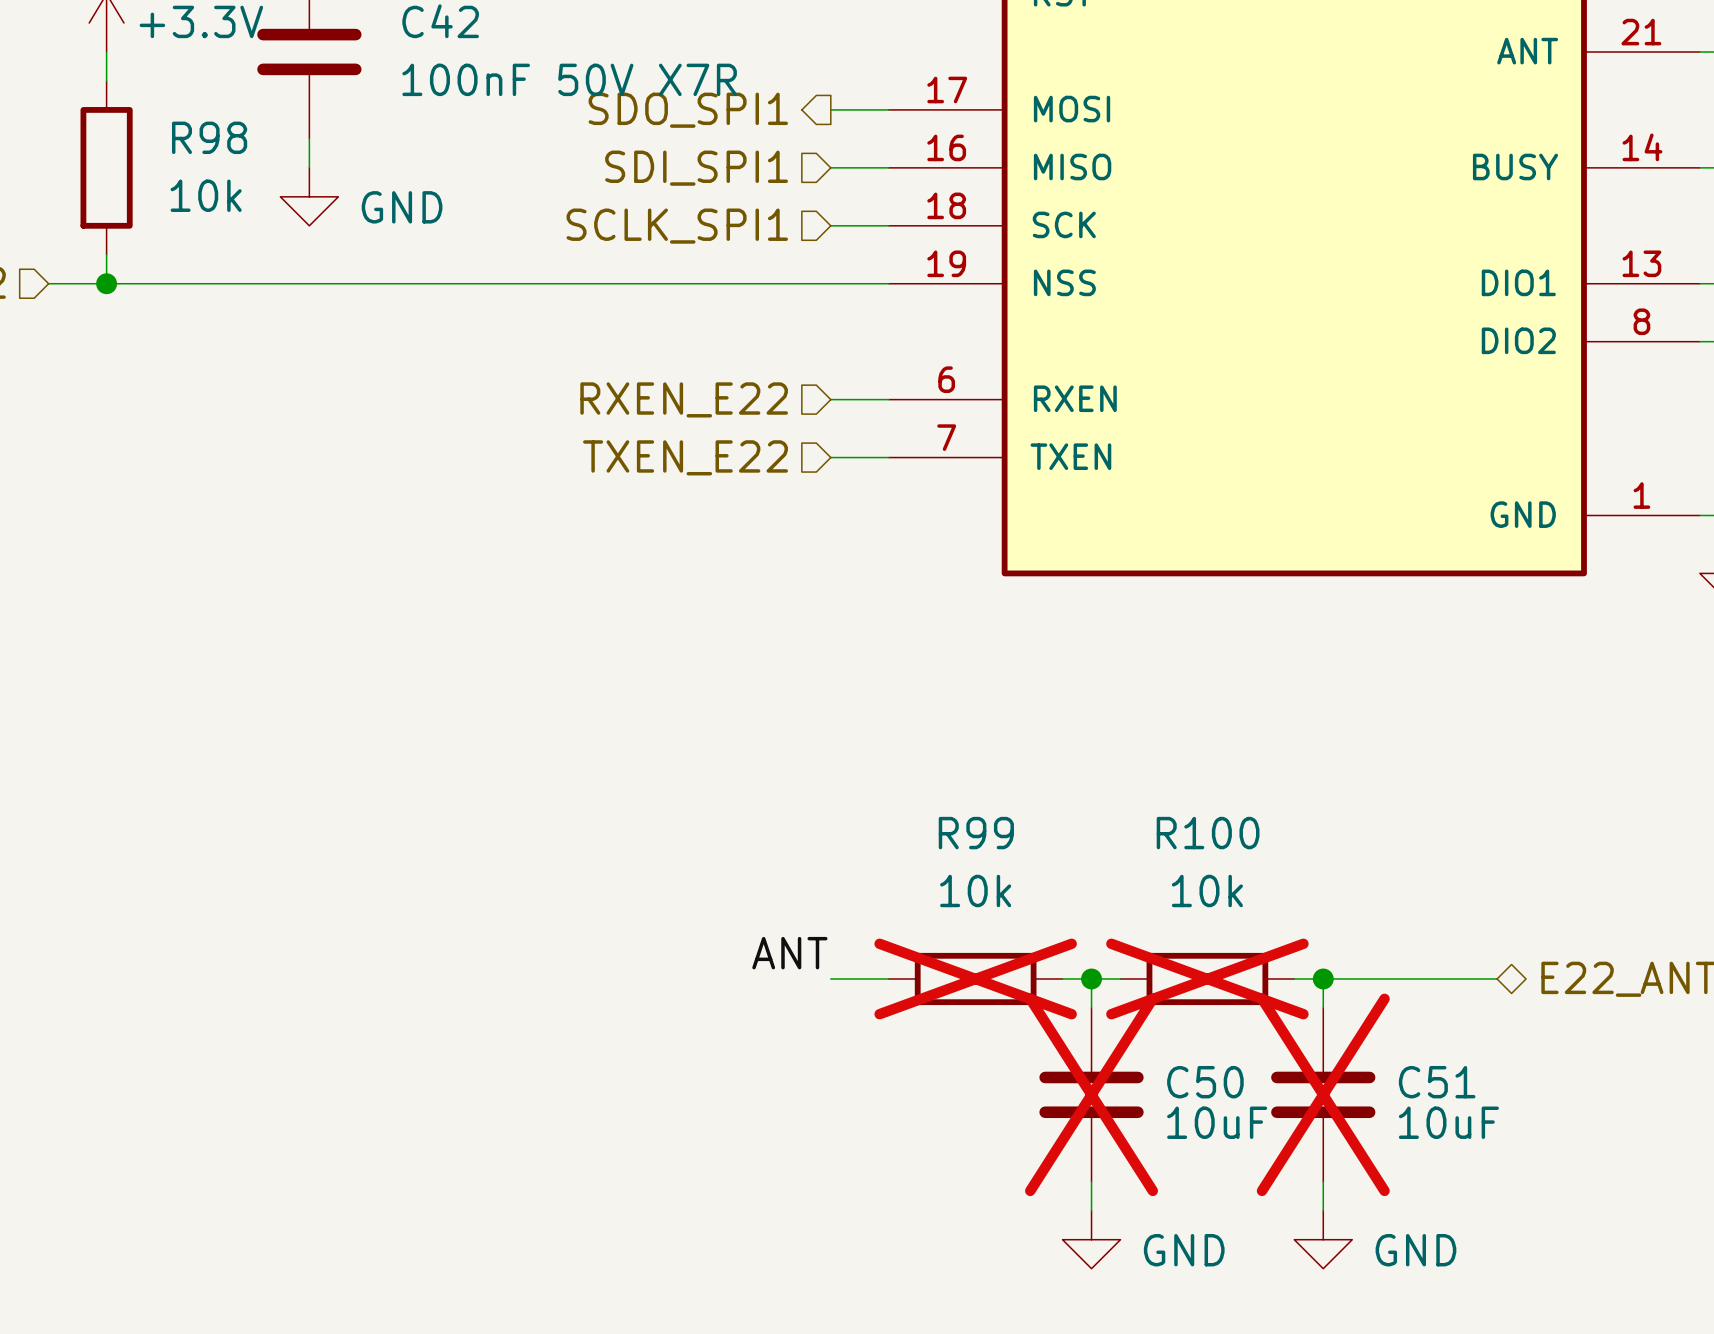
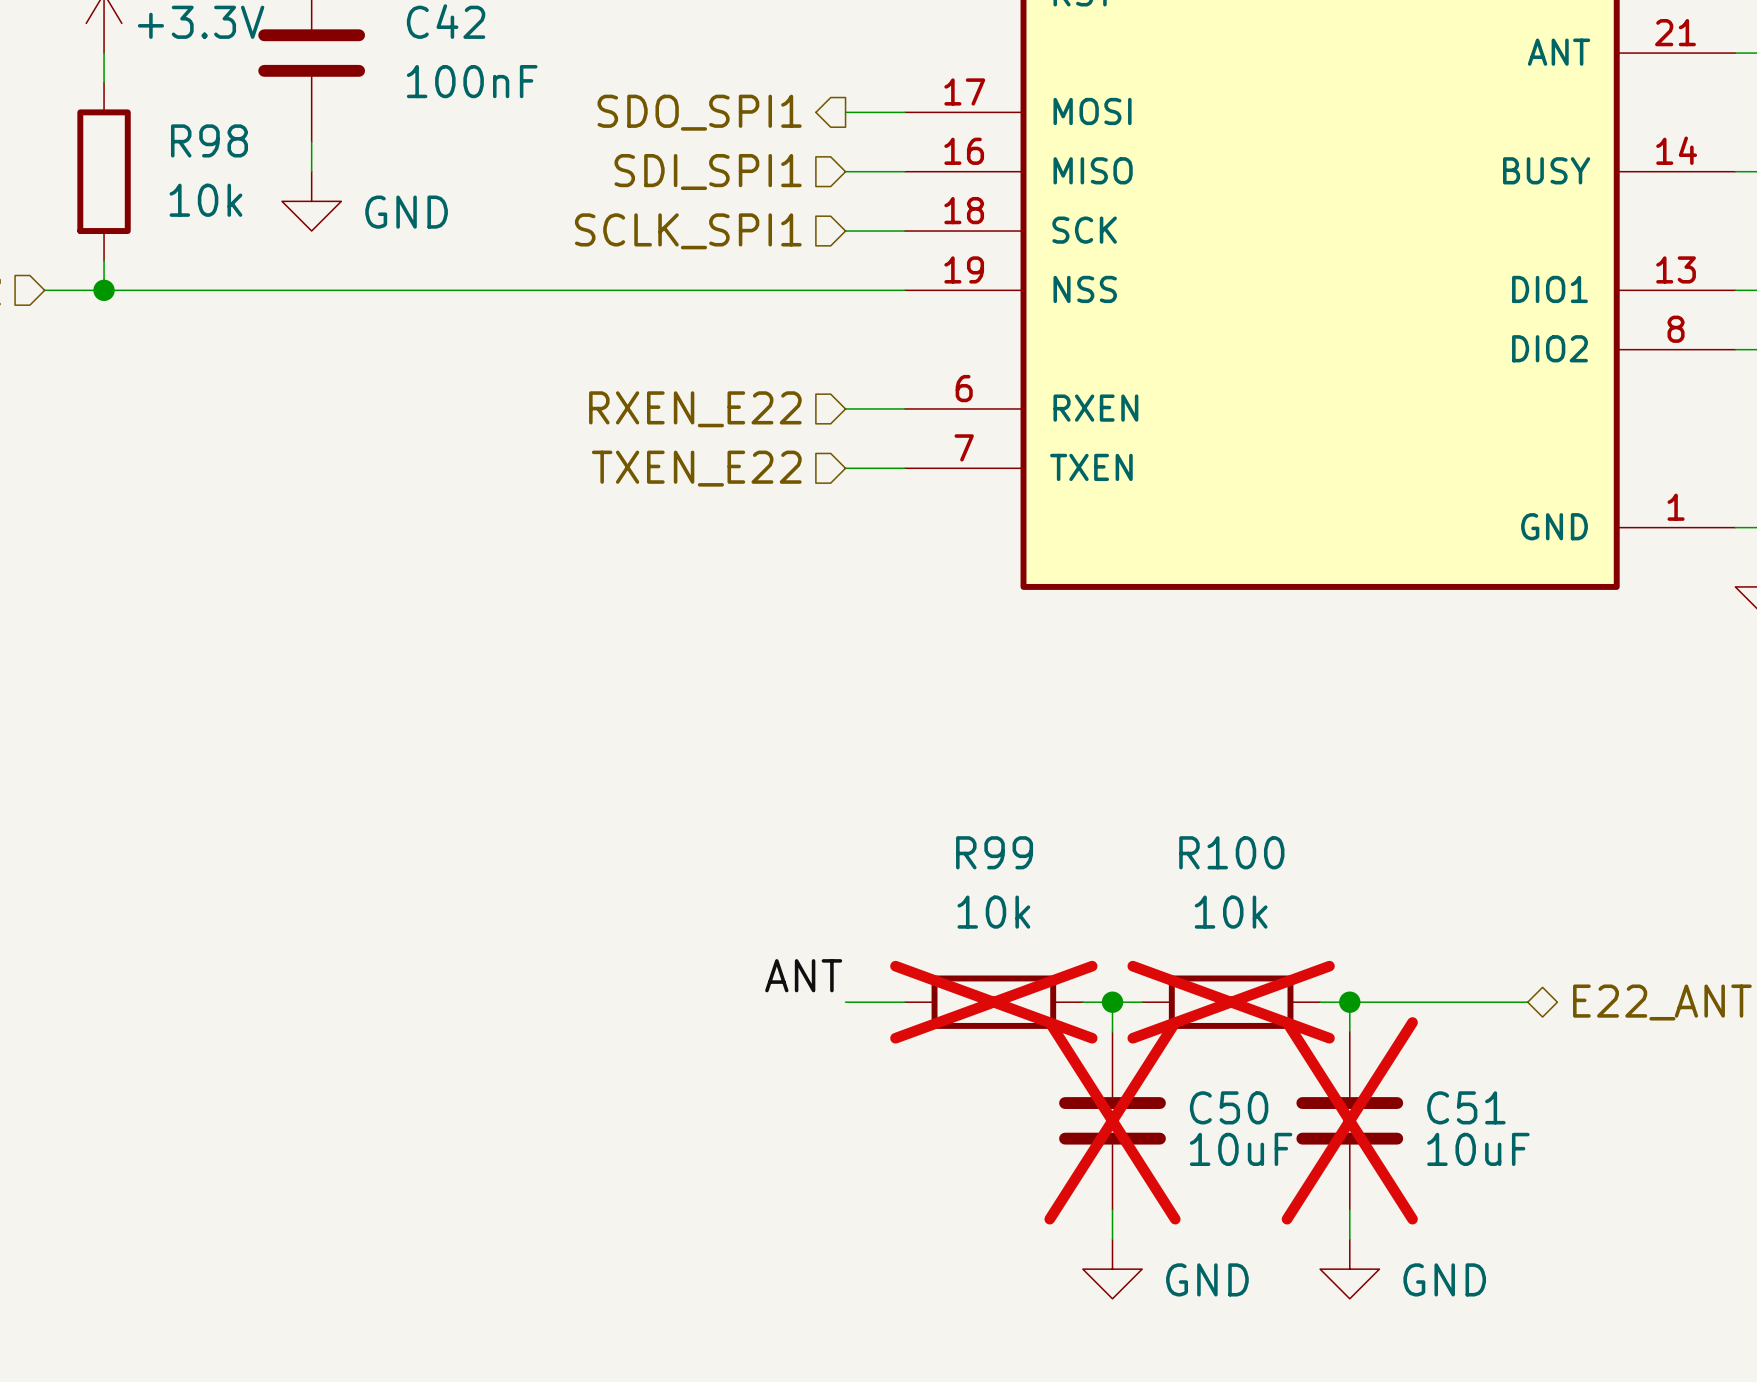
C42 value: 100nF 50V X7R (569, 79) -> 100nF (472, 81)

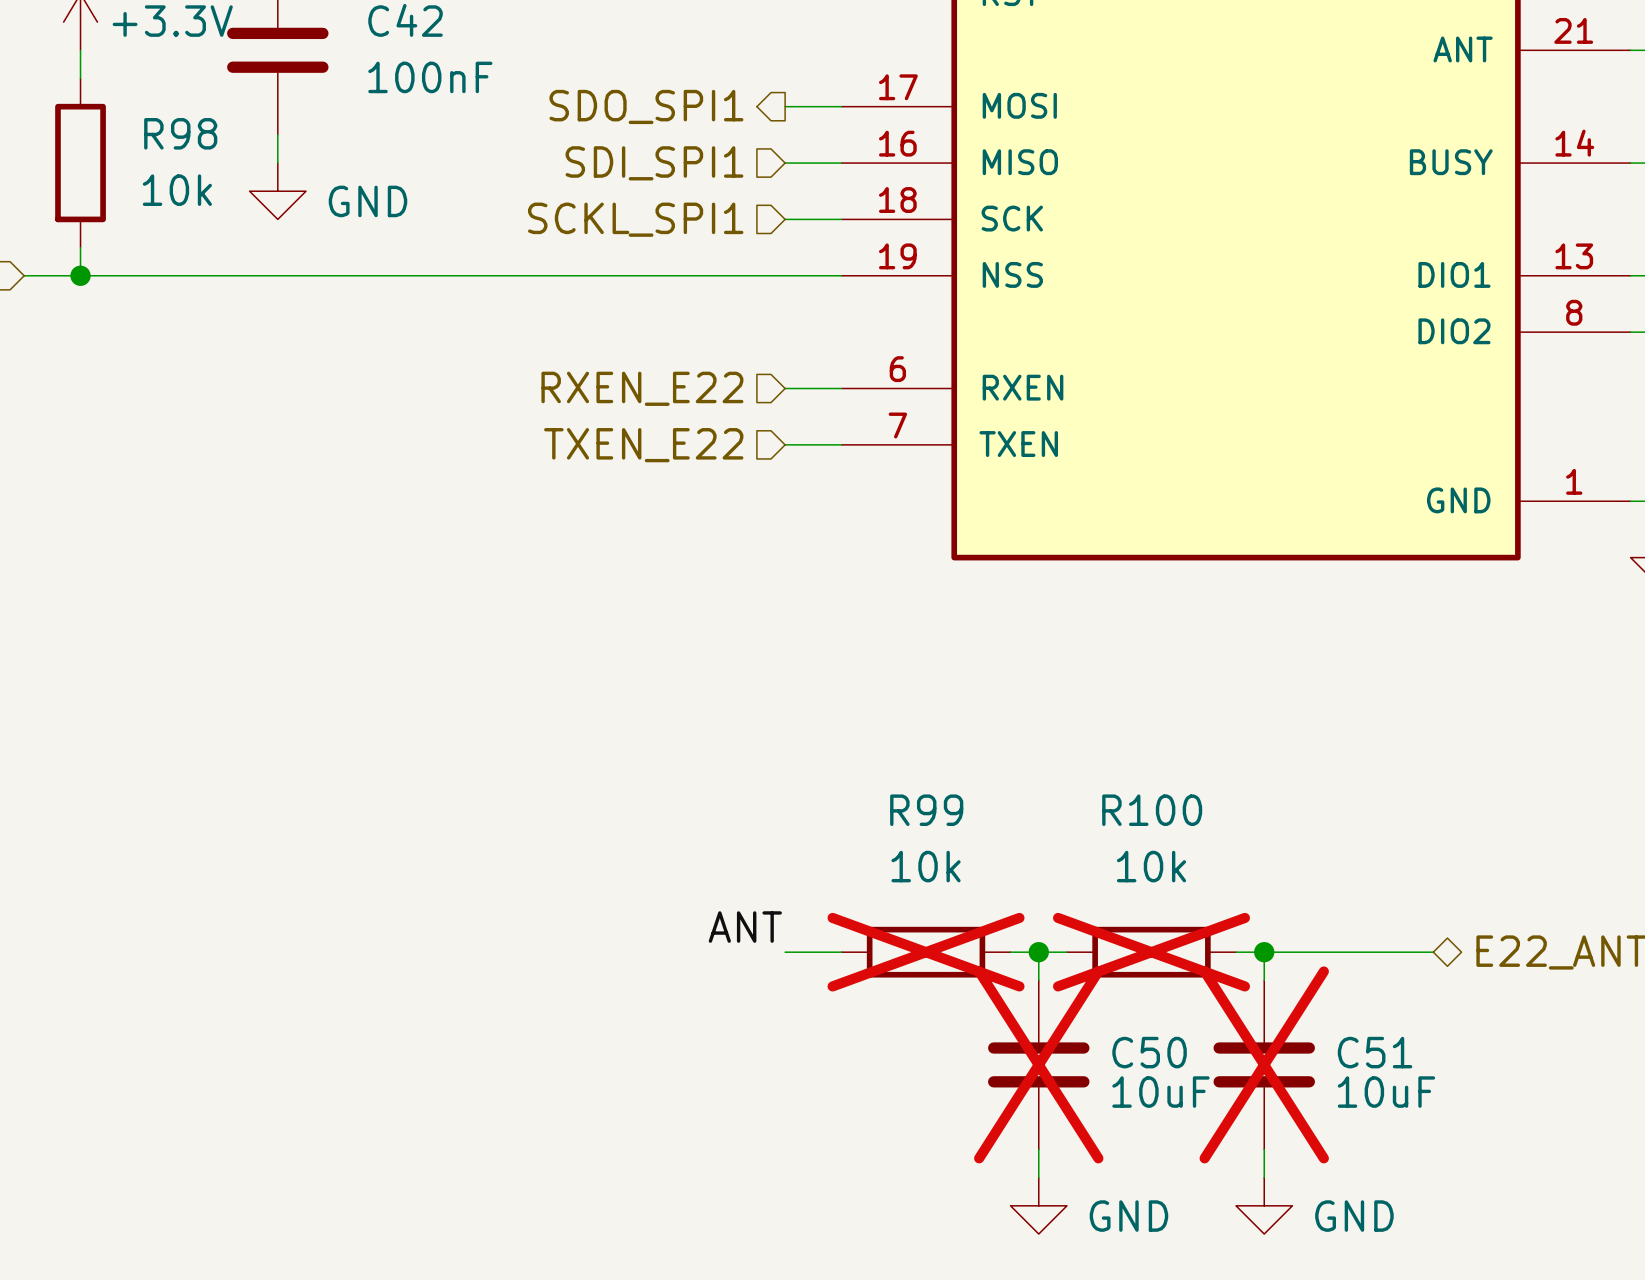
hierarchical label: SCLK_SPI1 (688, 231) -> SCKL_SPI1 (635, 219)

